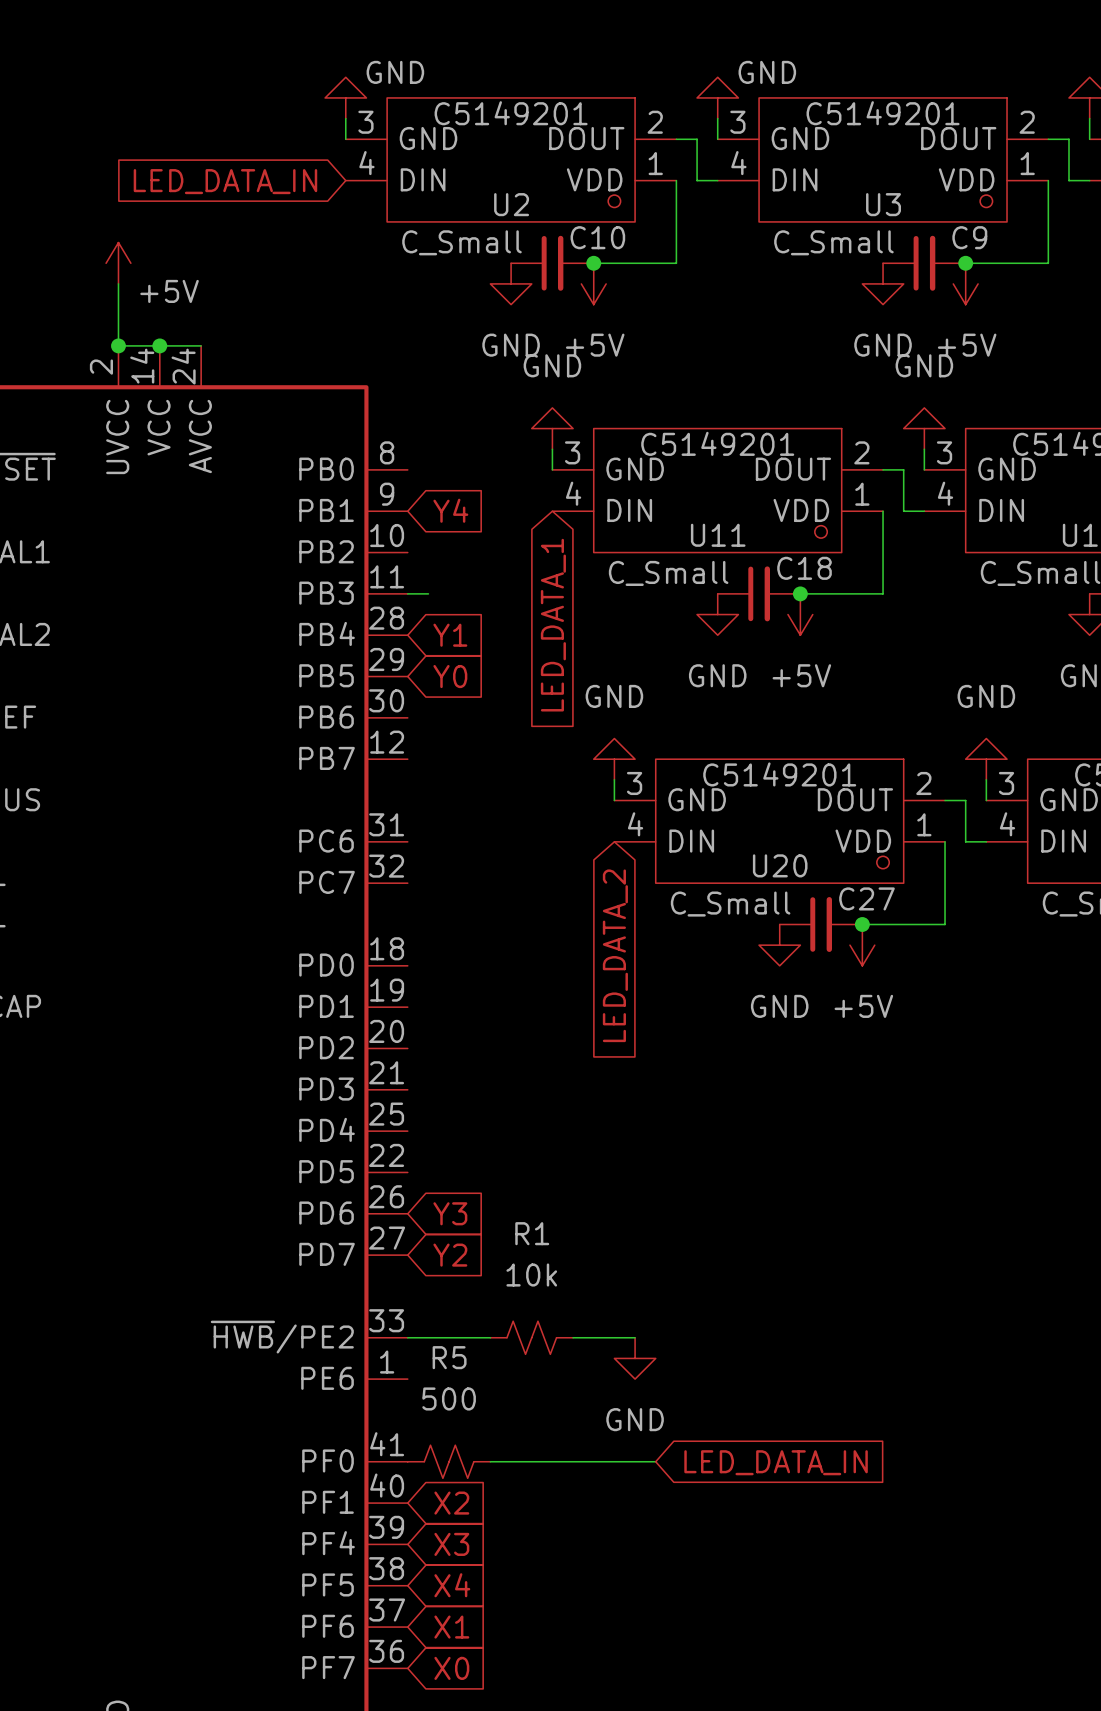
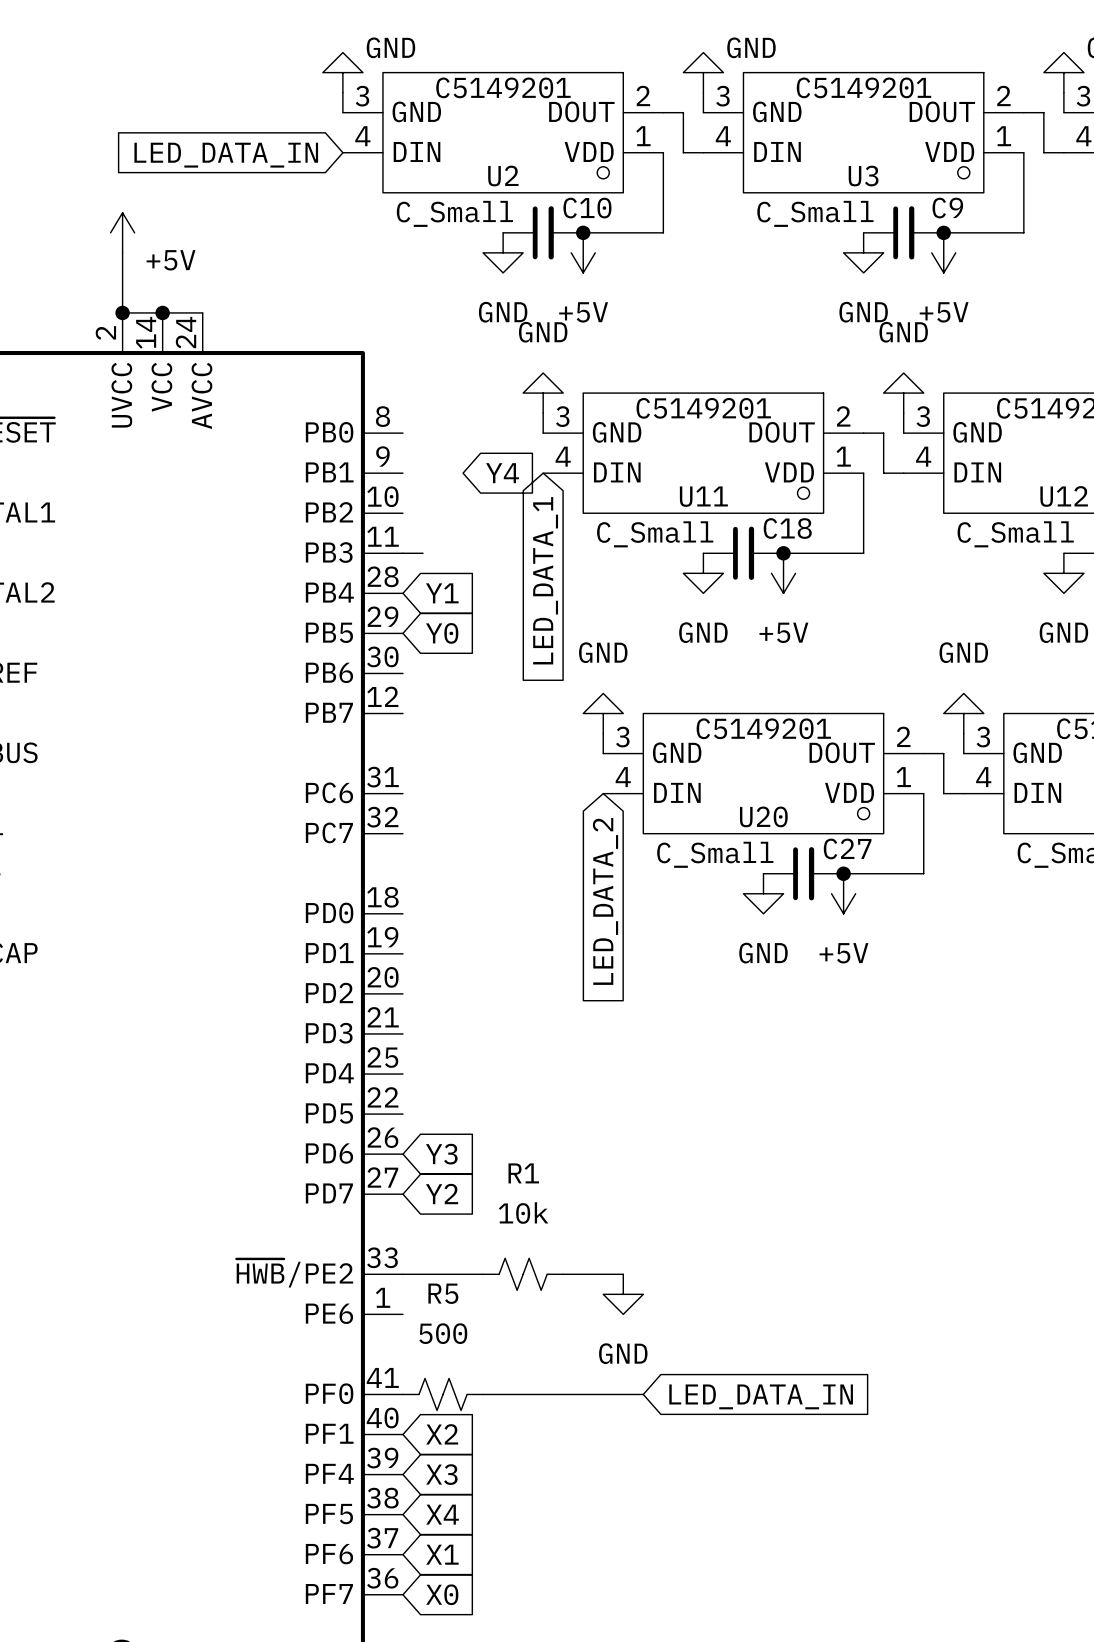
global label position: Y4 (450, 510) -> Y4 (502, 473)

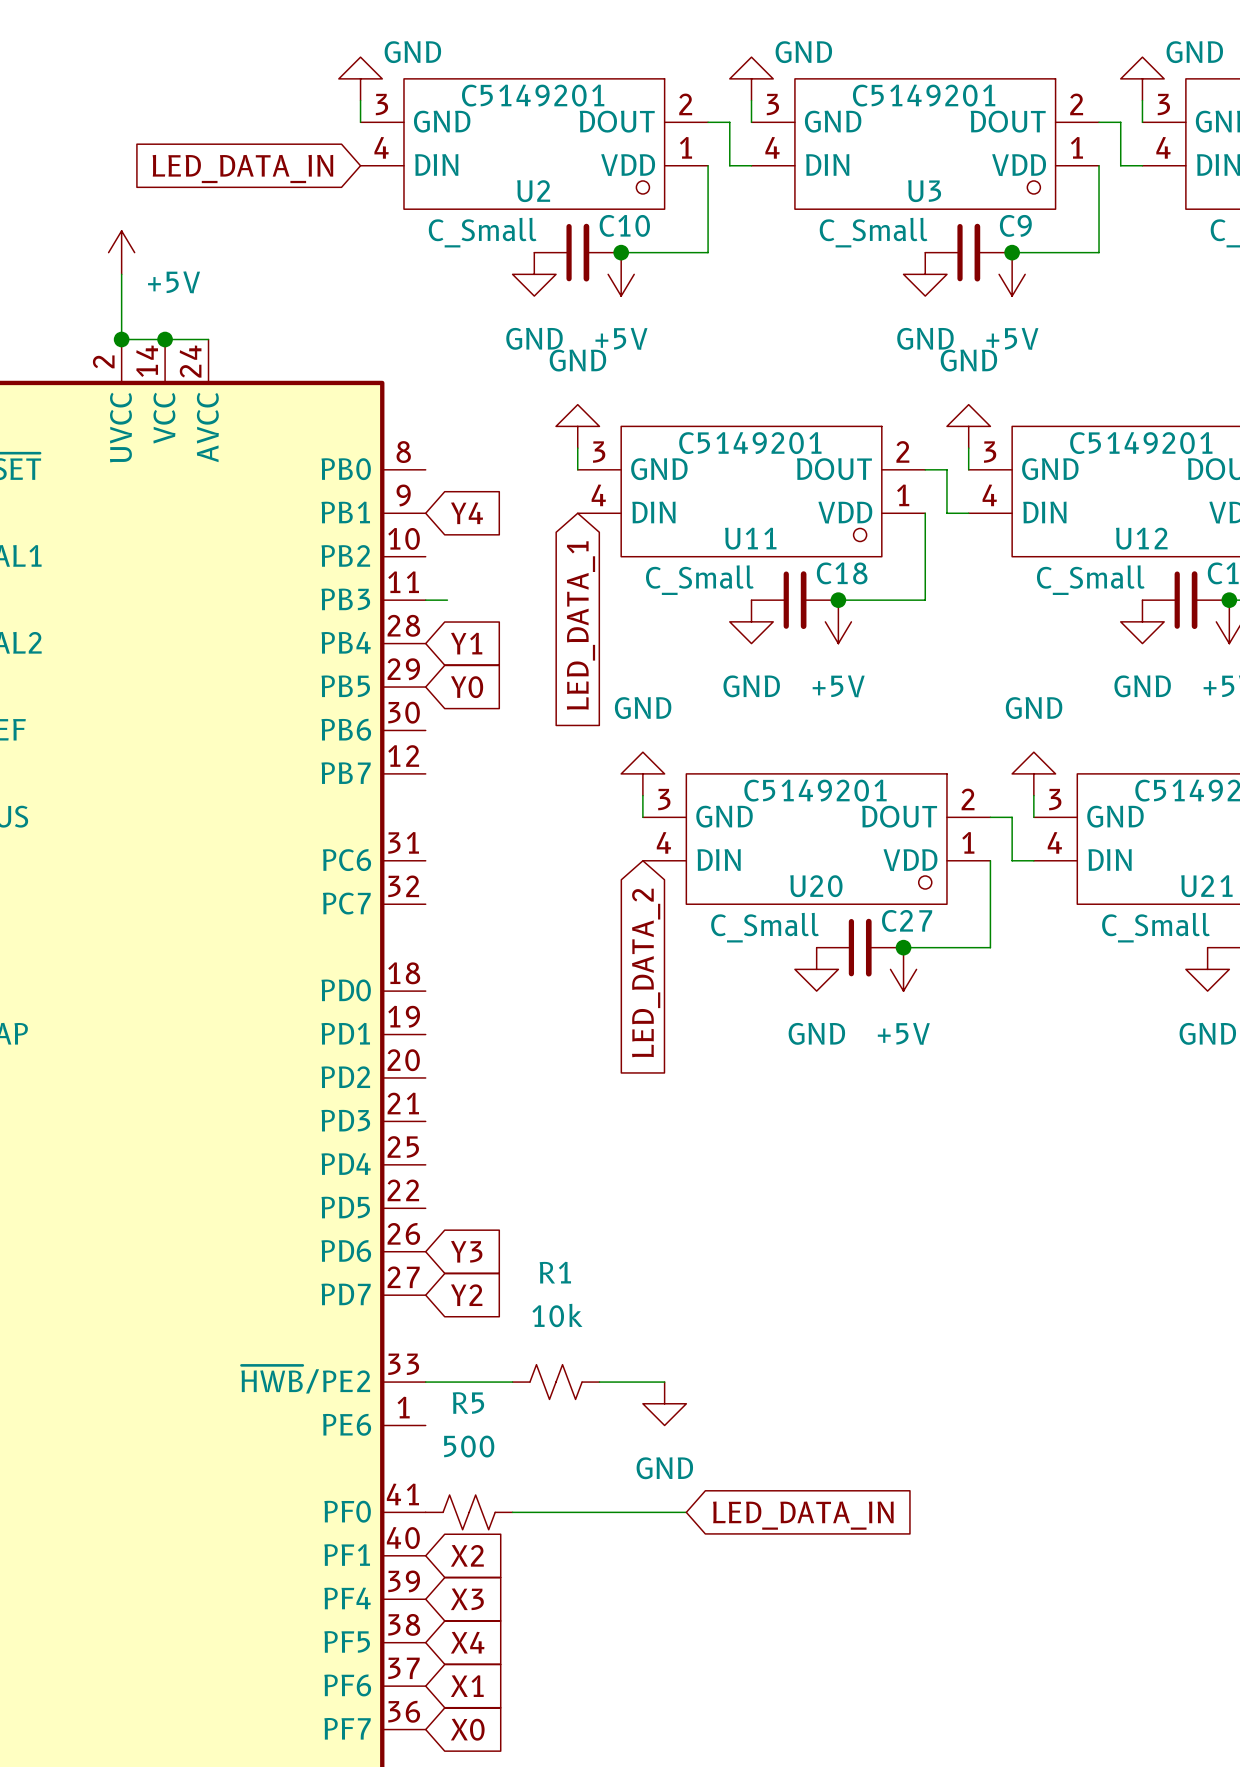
global label position: Y4 (502, 473) -> Y4 (466, 513)

